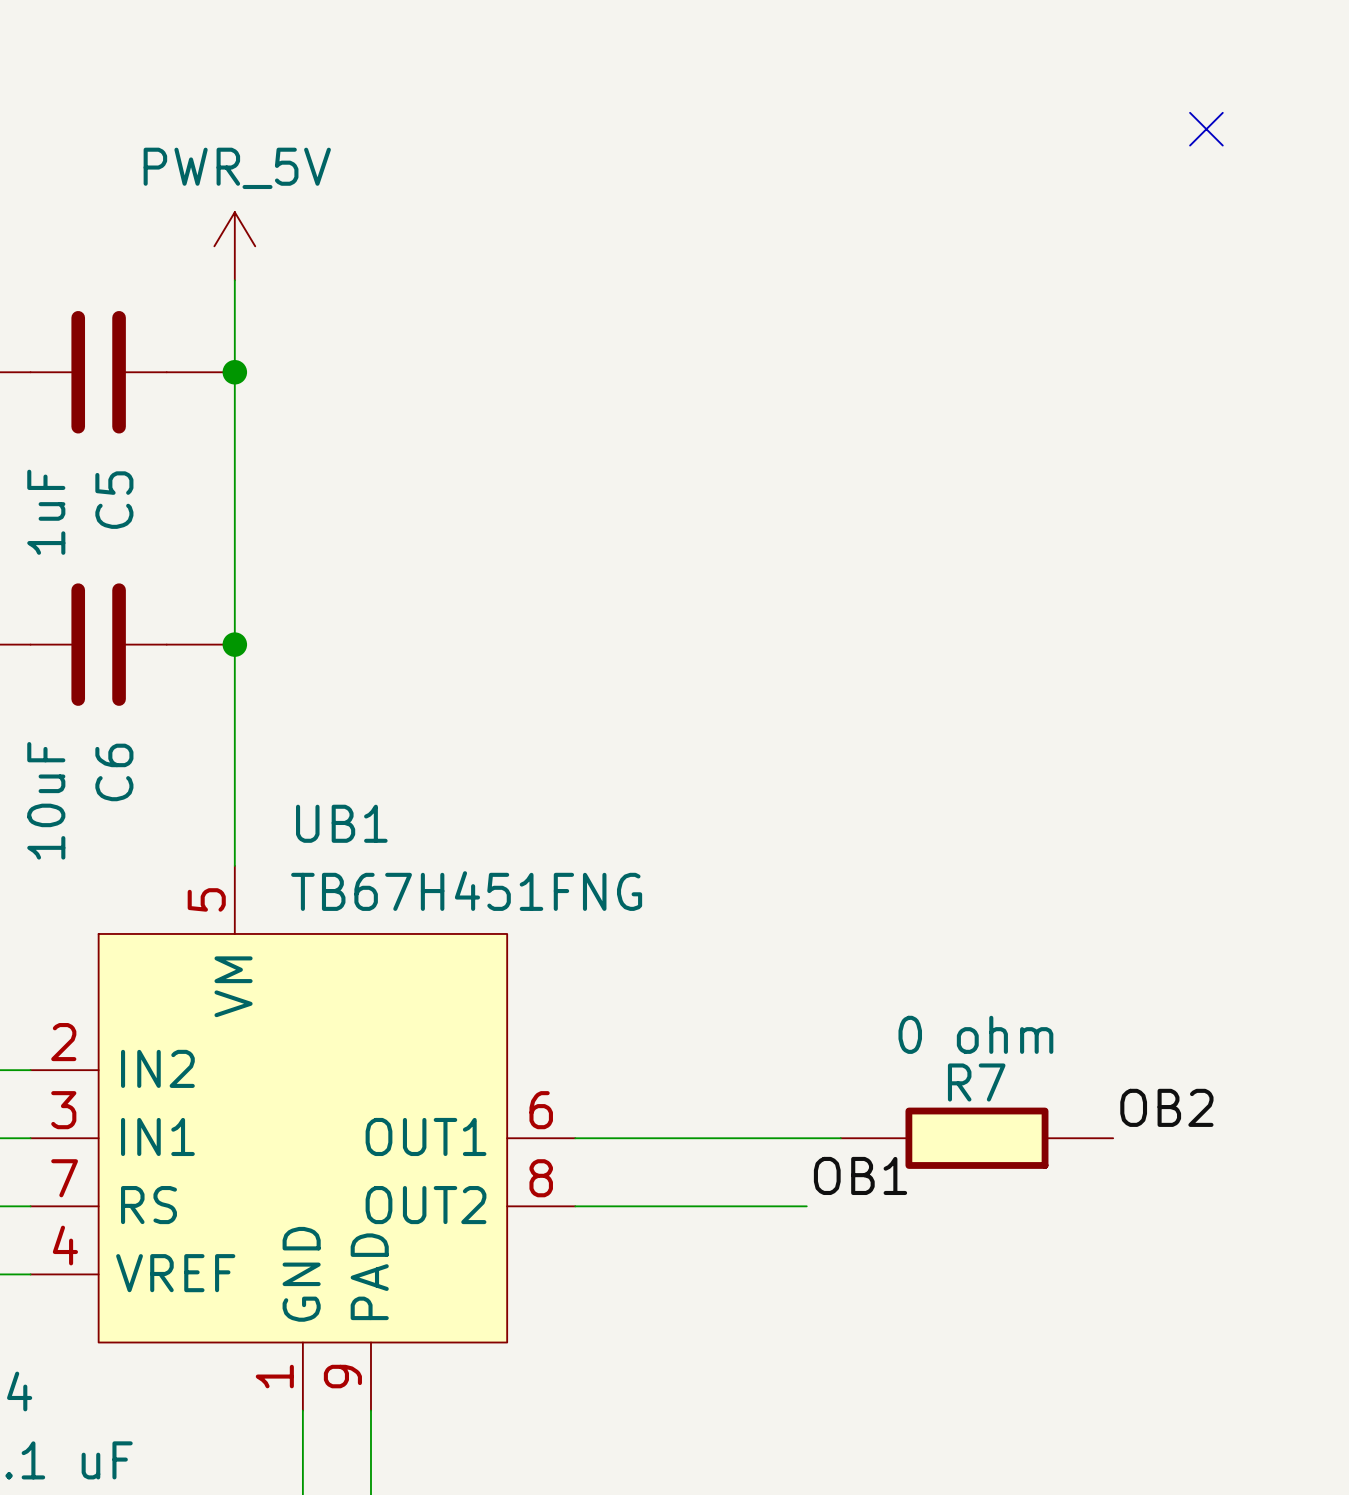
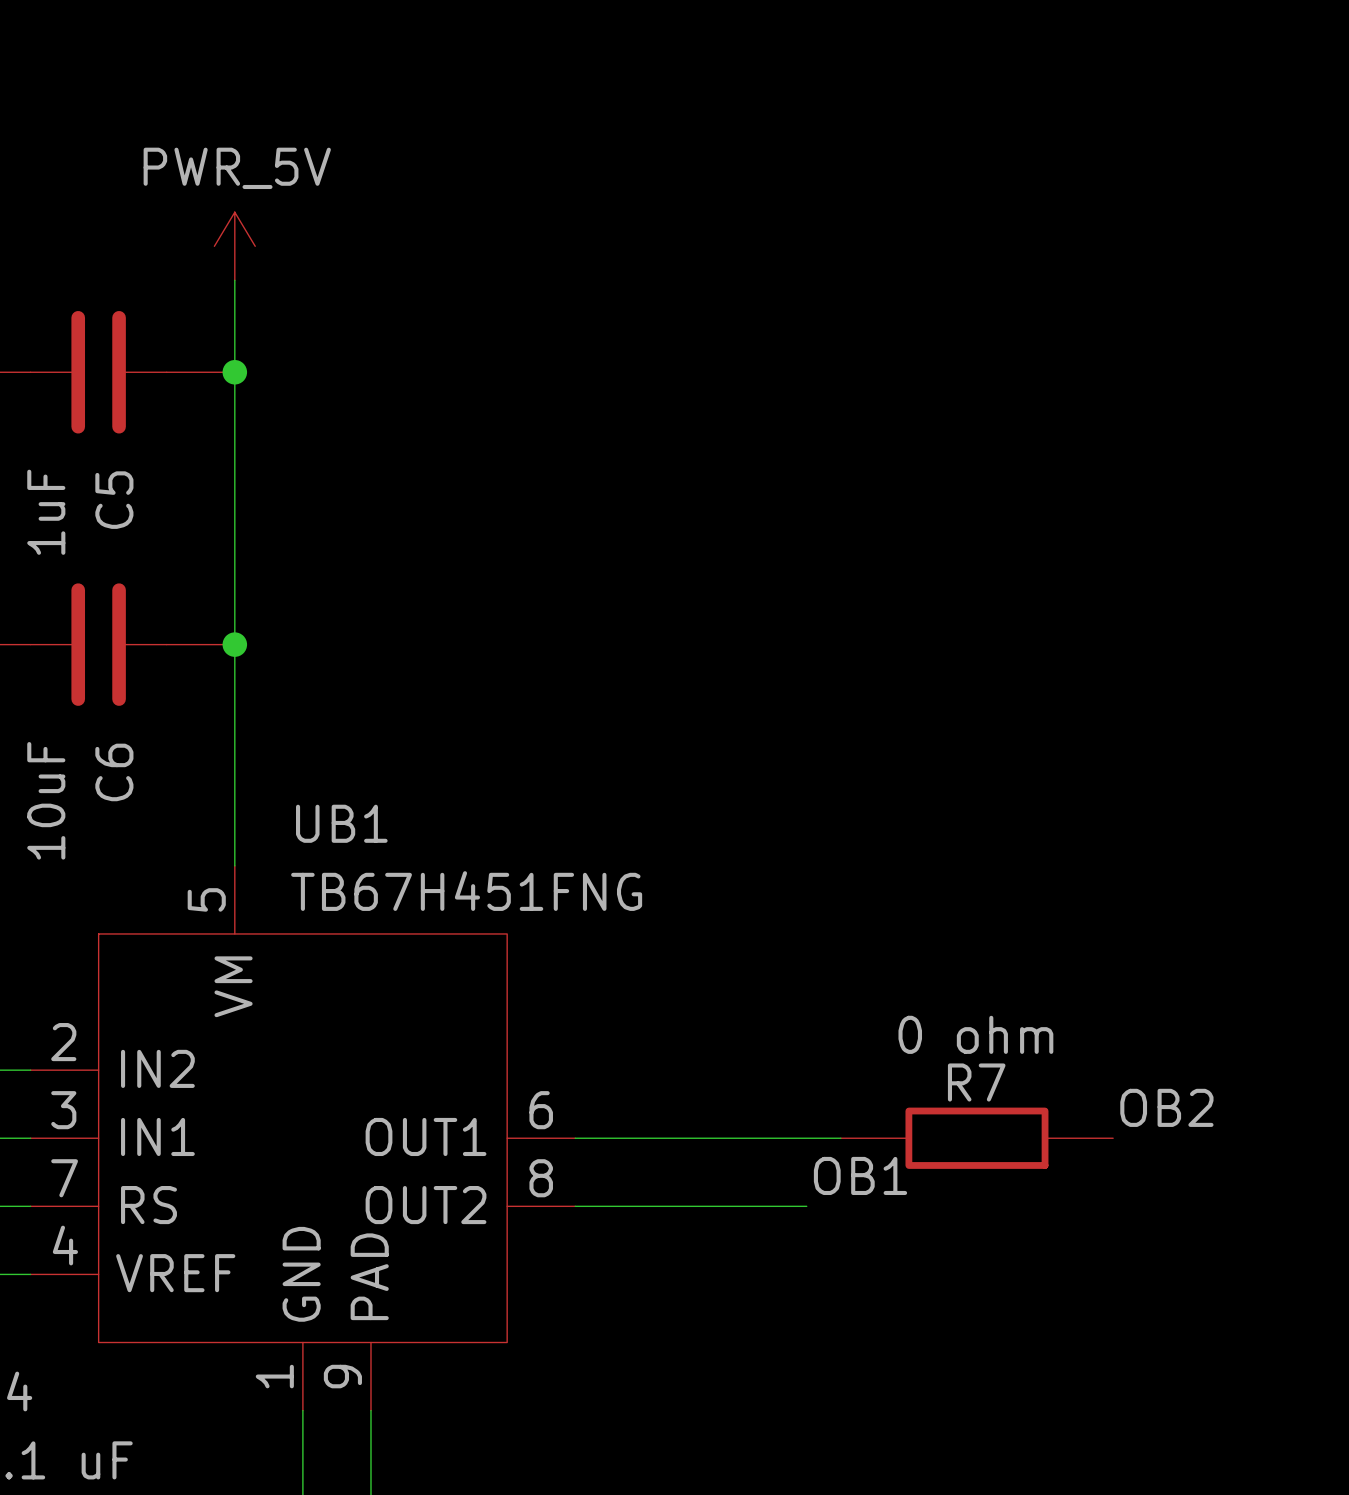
no-connect mark: (1206, 129) -> none

